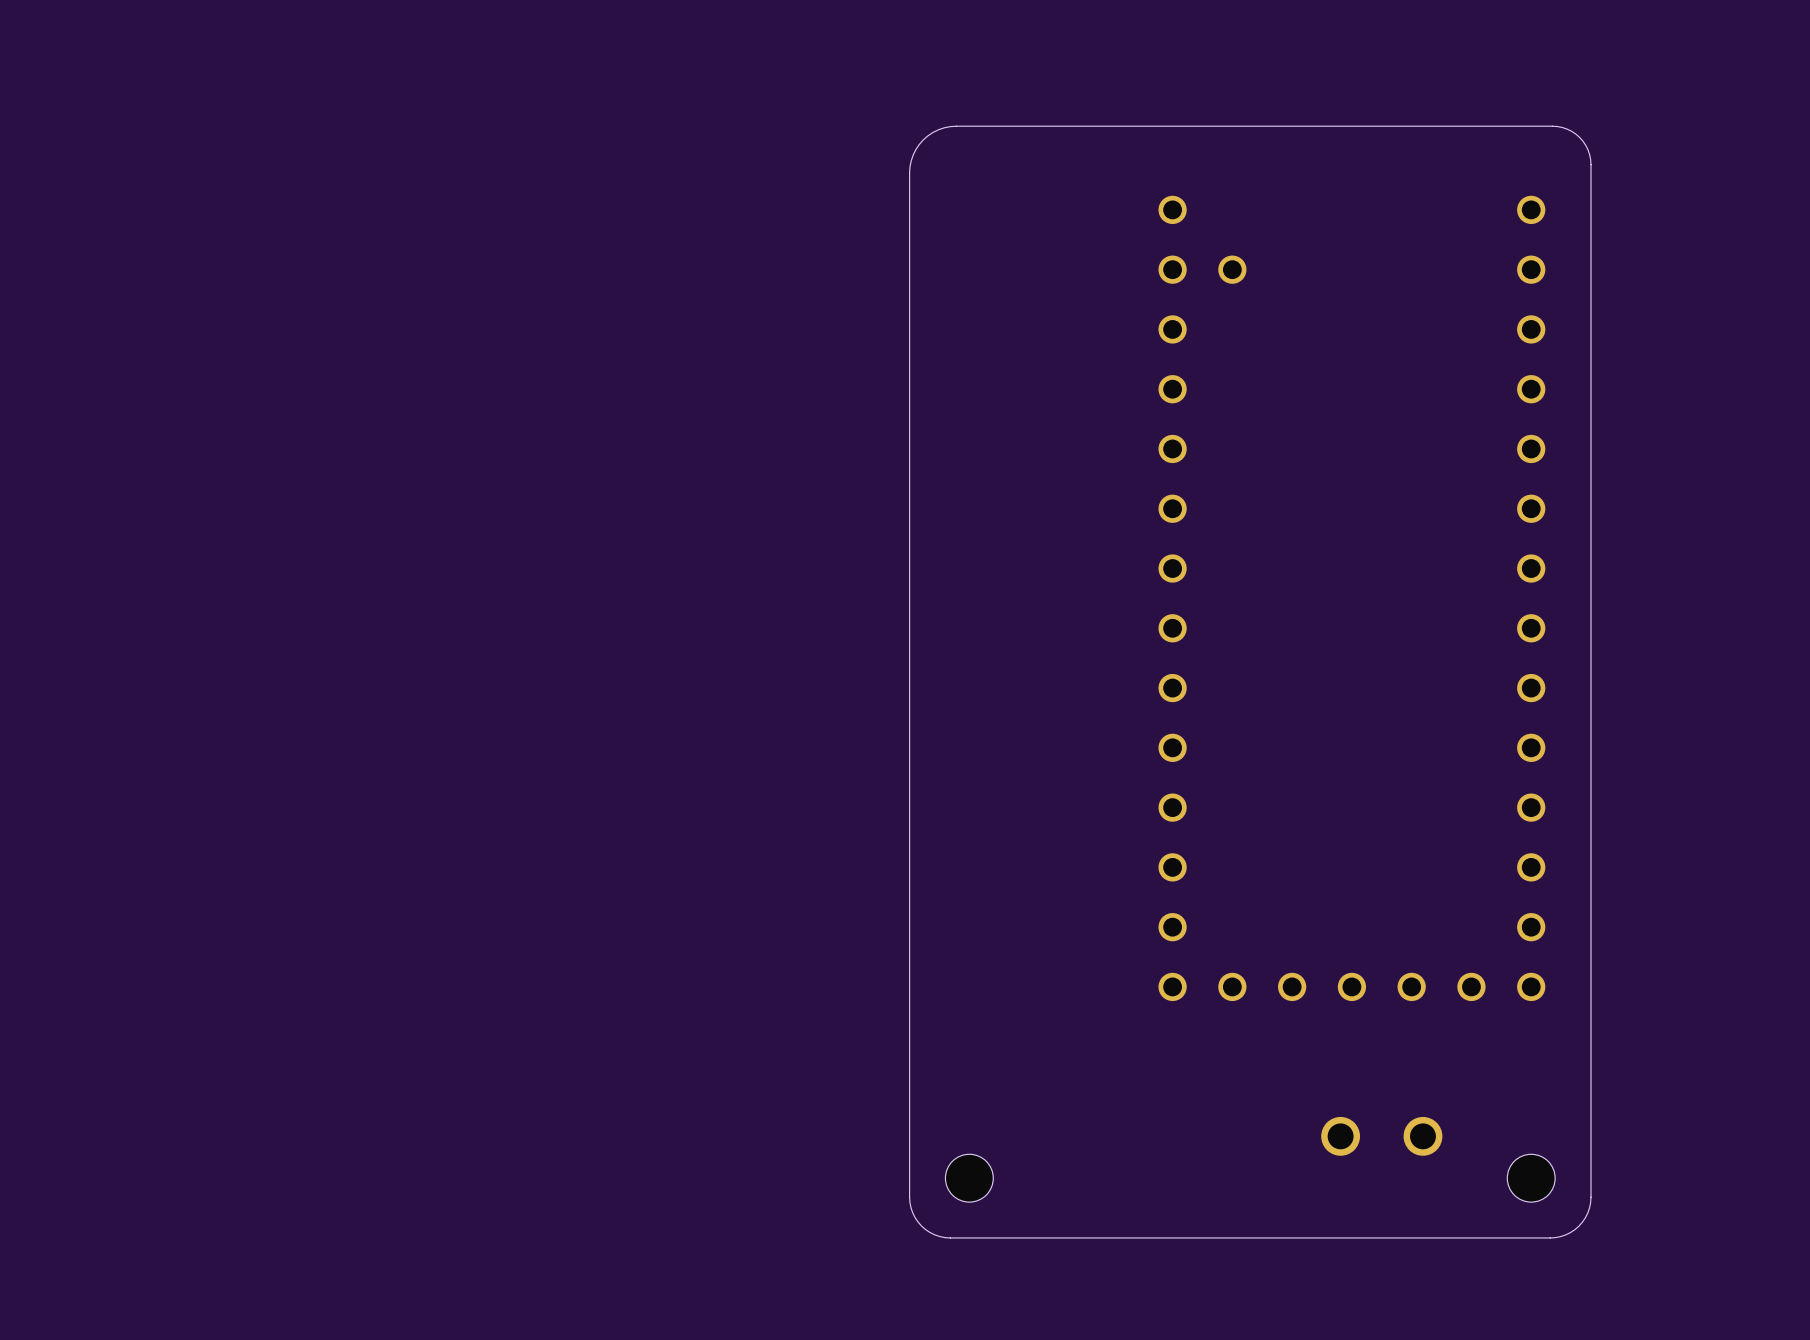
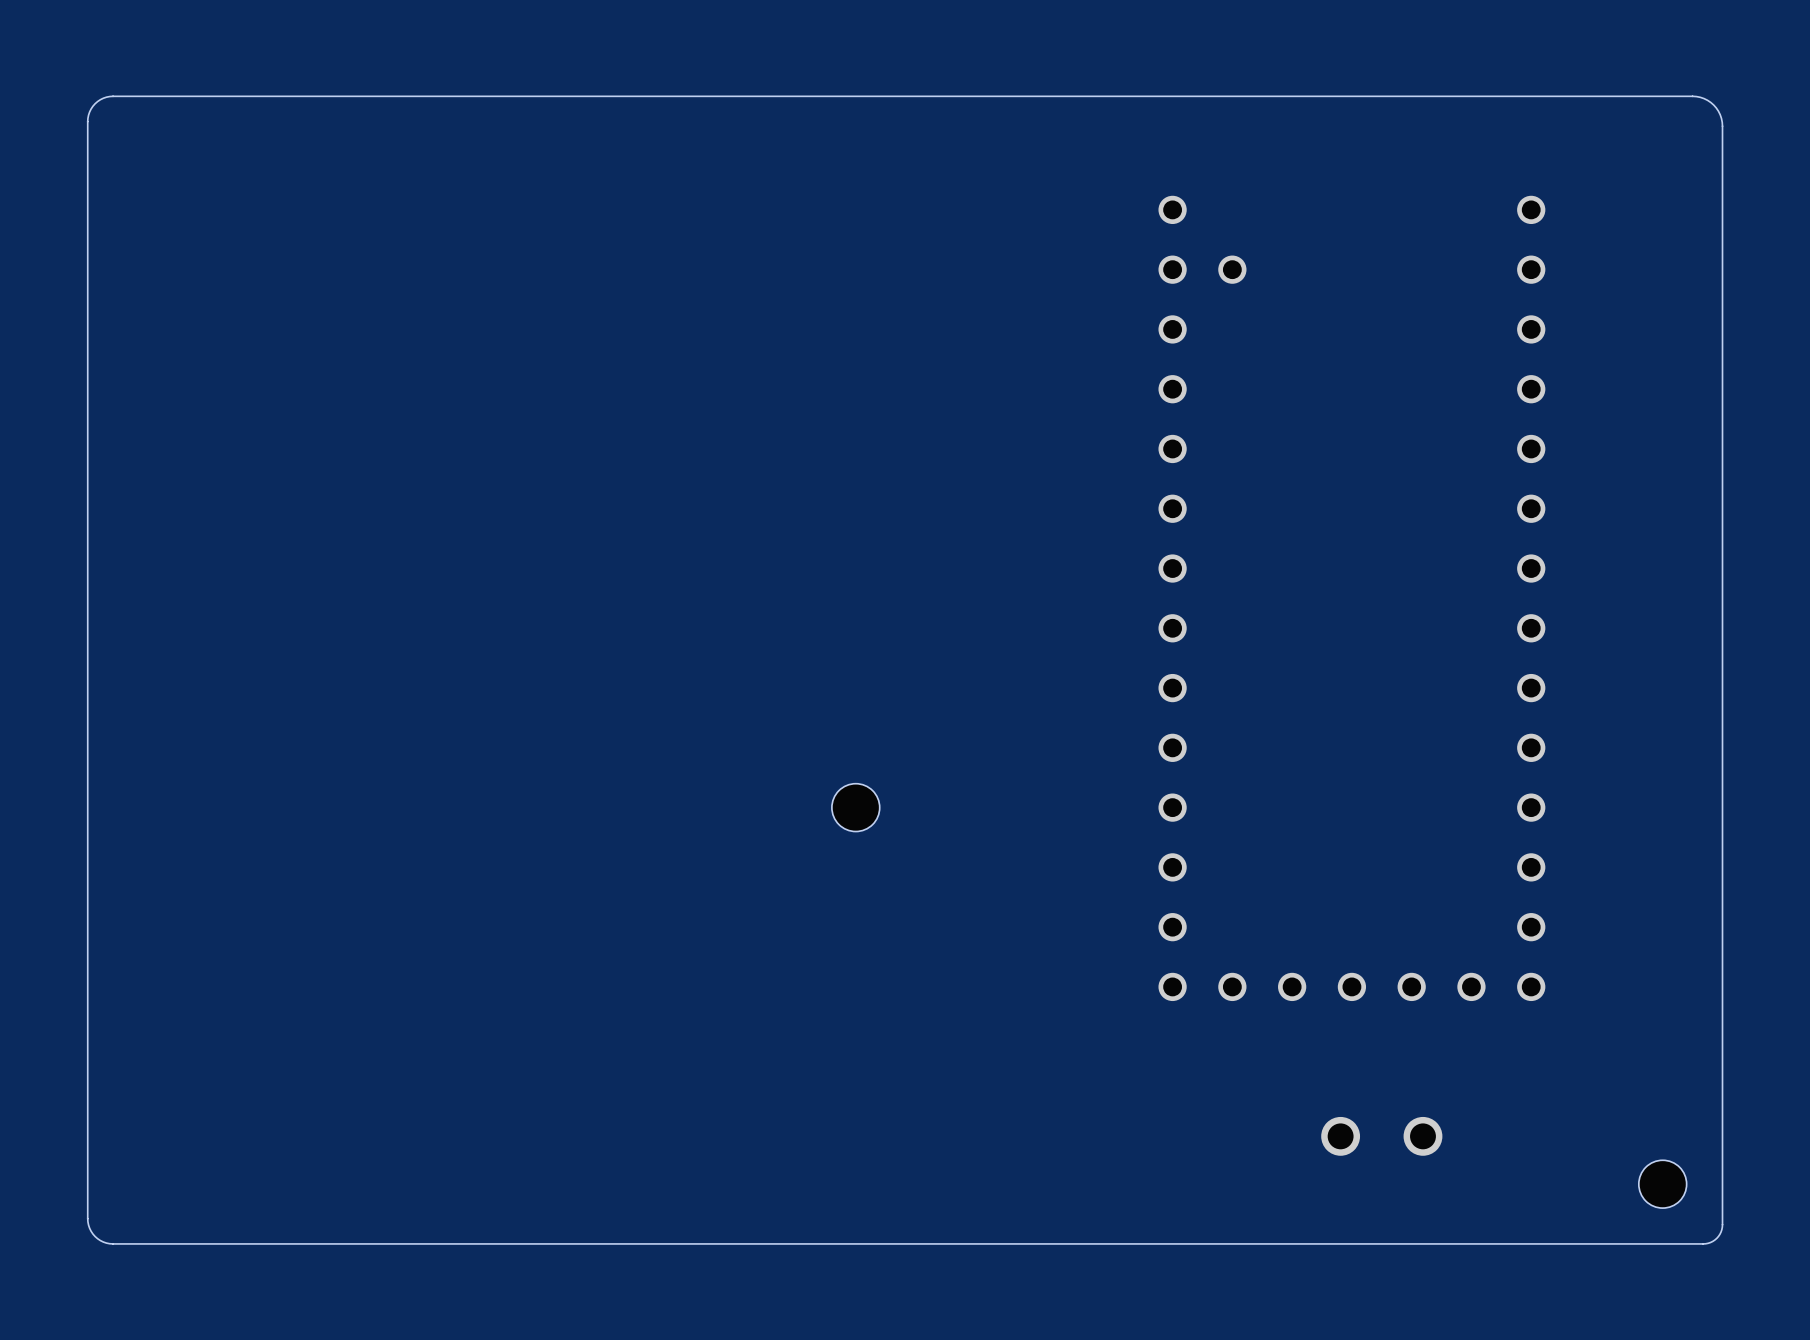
board edge: none -> (1692, 96) (113, 96) (97, 101) (89, 111) (87, 121) (87, 1218) (92, 1234) (103, 1242) (113, 1243) (1703, 1243) (1714, 1239) (1721, 1232) (1722, 1224) (1722, 126) (1720, 114) (1713, 105) (1704, 98) (1692, 96)
board edge: (1552, 126) (956, 126) (944, 127) (932, 132) (923, 139) (915, 149) (911, 160) (909, 173) (909, 1197) (915, 1217) (930, 1232) (950, 1237) (1550, 1237) (1570, 1232) (1585, 1217) (1591, 1197) (1591, 164) (1588, 150) (1579, 137) (1567, 129) (1552, 126) -> none
part: none -> (855, 807)
part: (969, 1178) -> none
part position: (1531, 1178) -> (1662, 1184)

